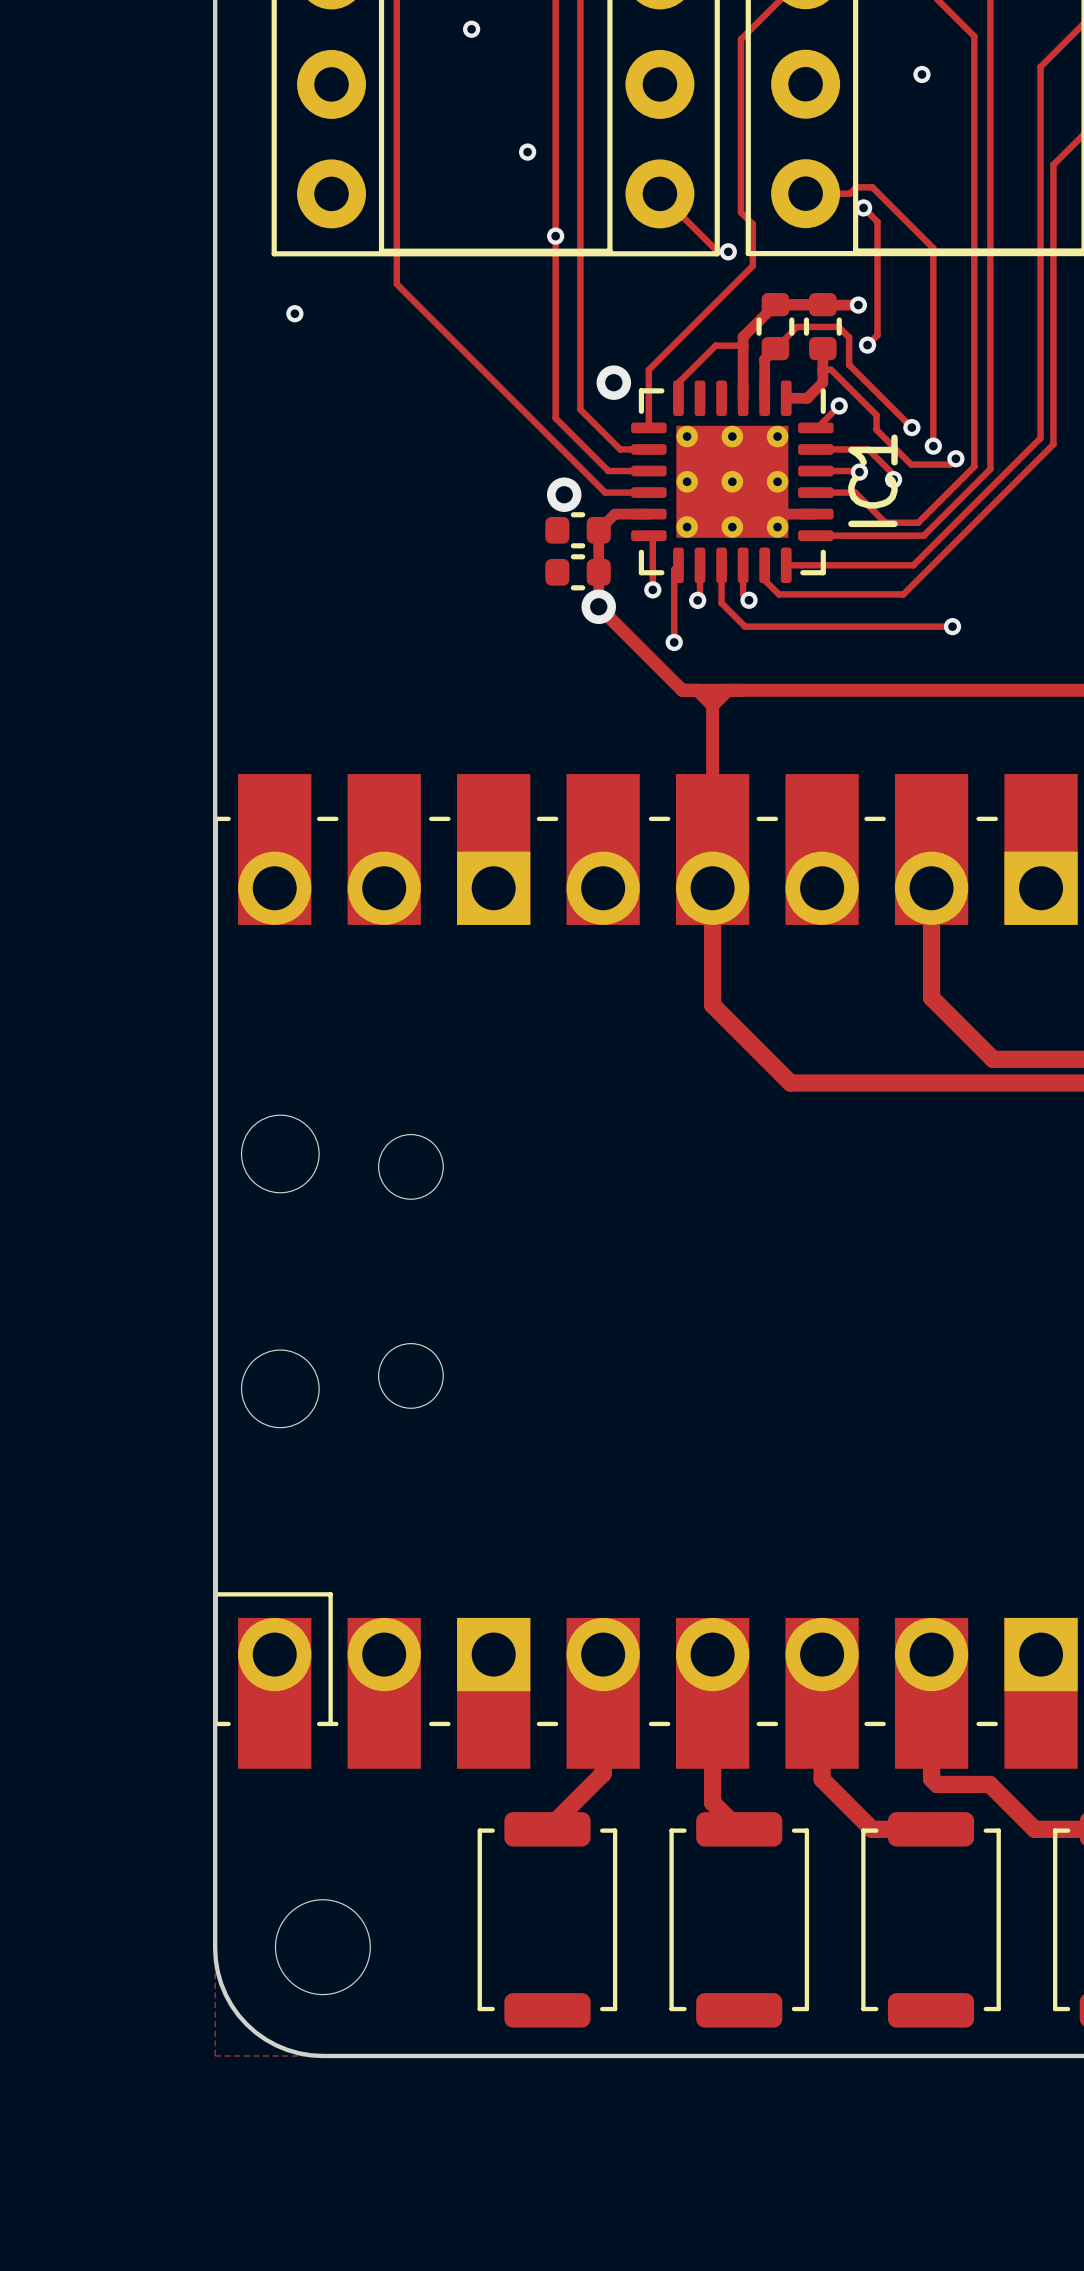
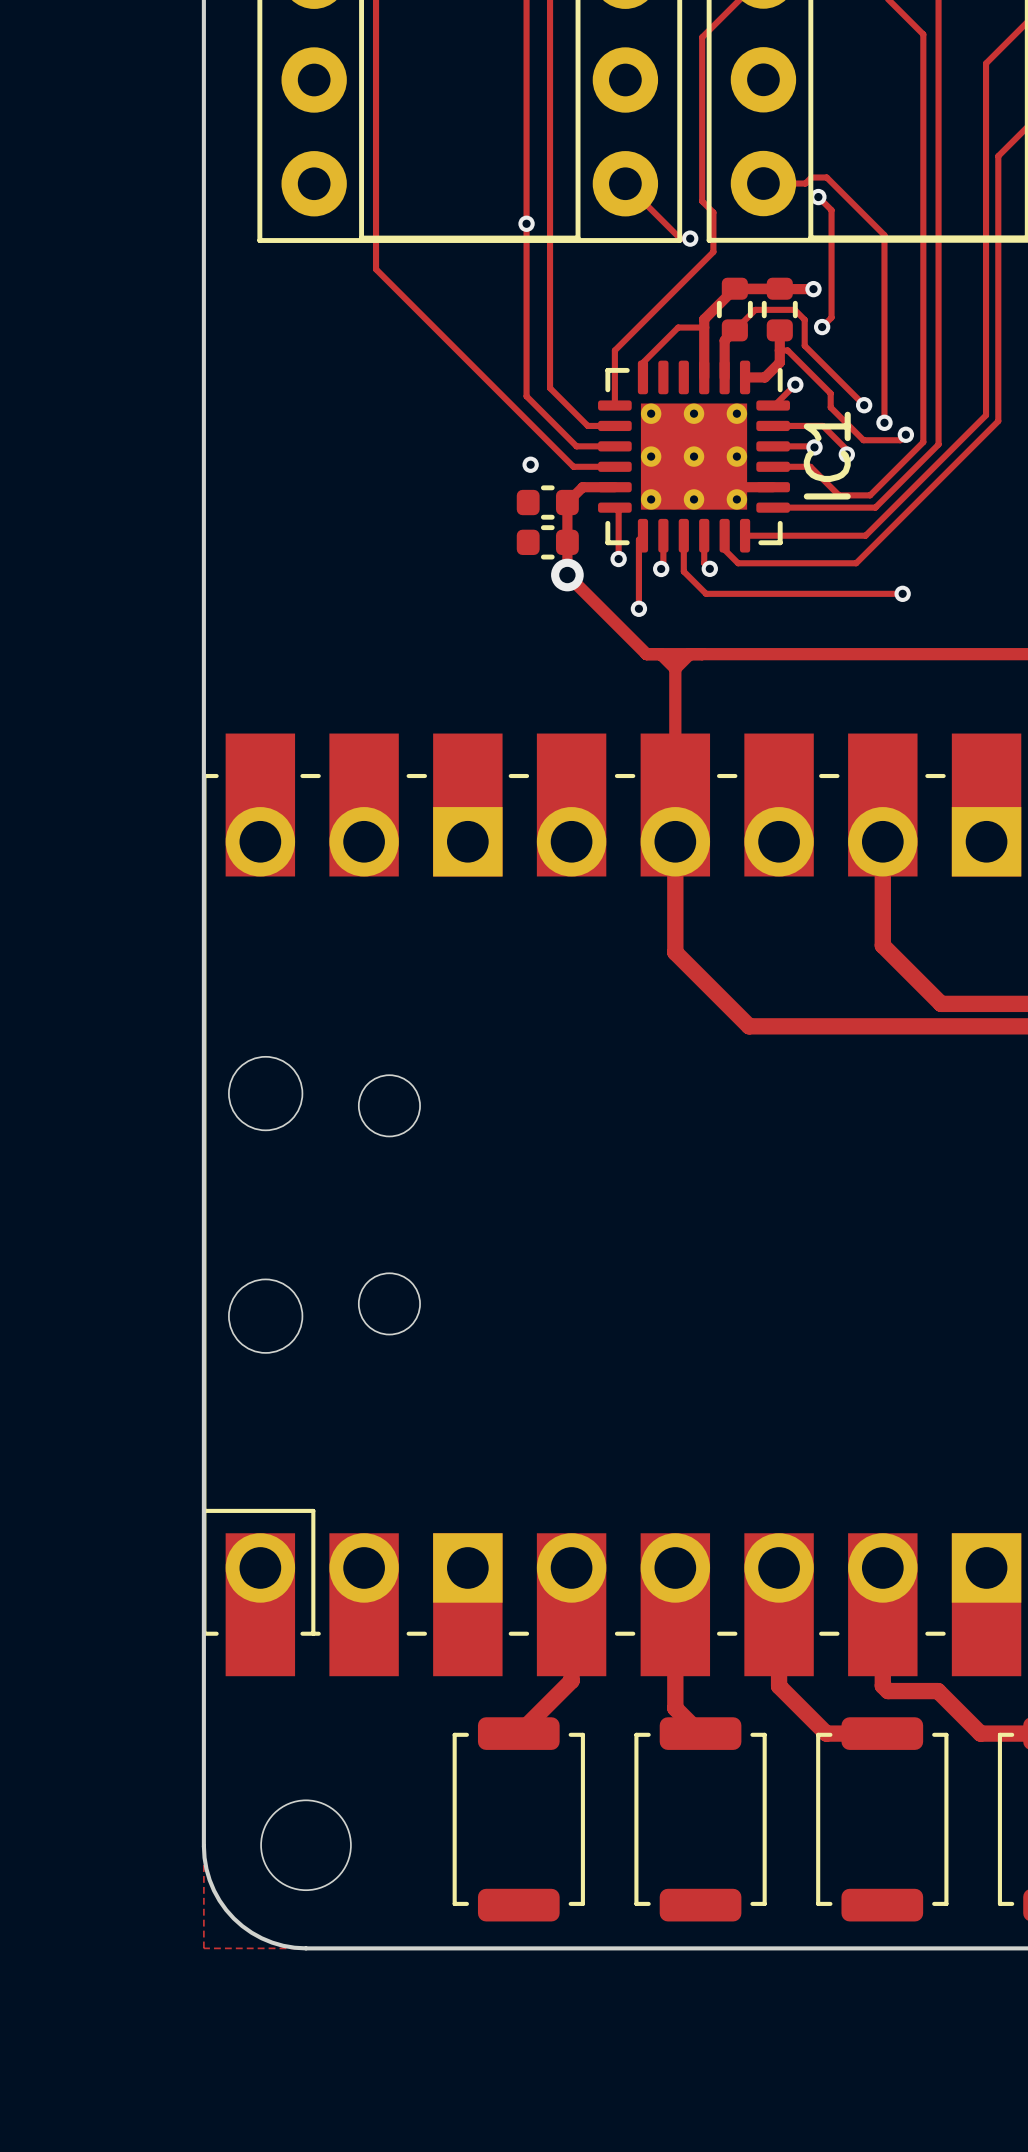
via: (471, 29) -> none
via: (921, 74) -> none
via: (527, 152) -> none
via: (294, 313) -> none
via: (613, 382) -> none
via size: [547, 477, 582, 512] -> [522, 456, 539, 473]

